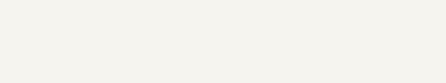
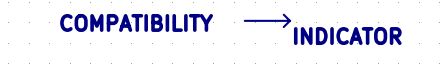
line: none -> (283, 14) (289, 20)
line: none -> (244, 20) (289, 20)
line: none -> (289, 20) (283, 27)
text: none -> COMPATIBILITY (136, 22)
text: none -> INDICATOR (347, 36)

